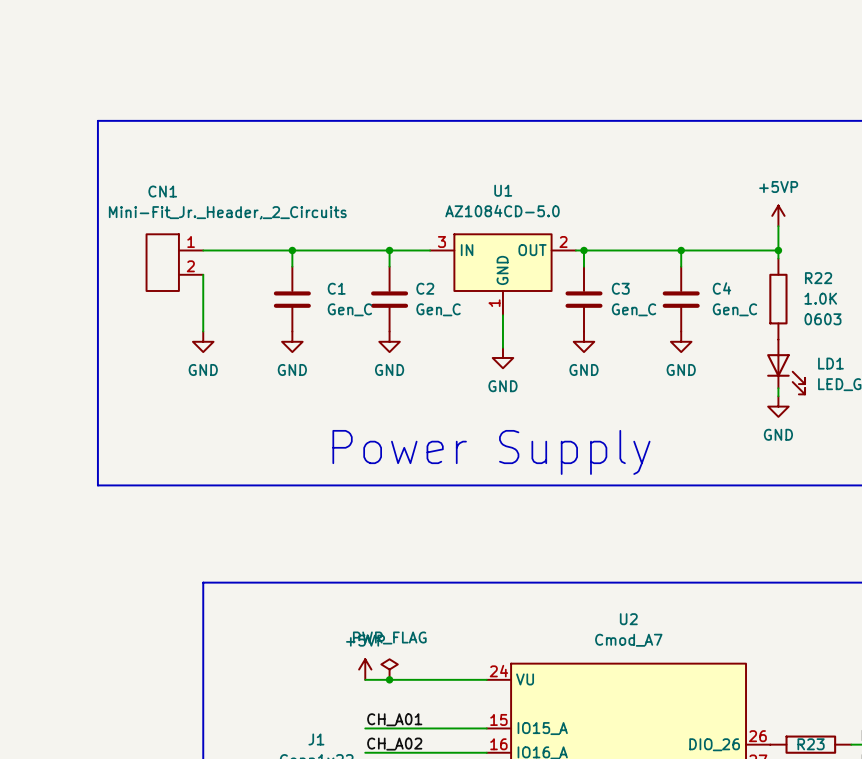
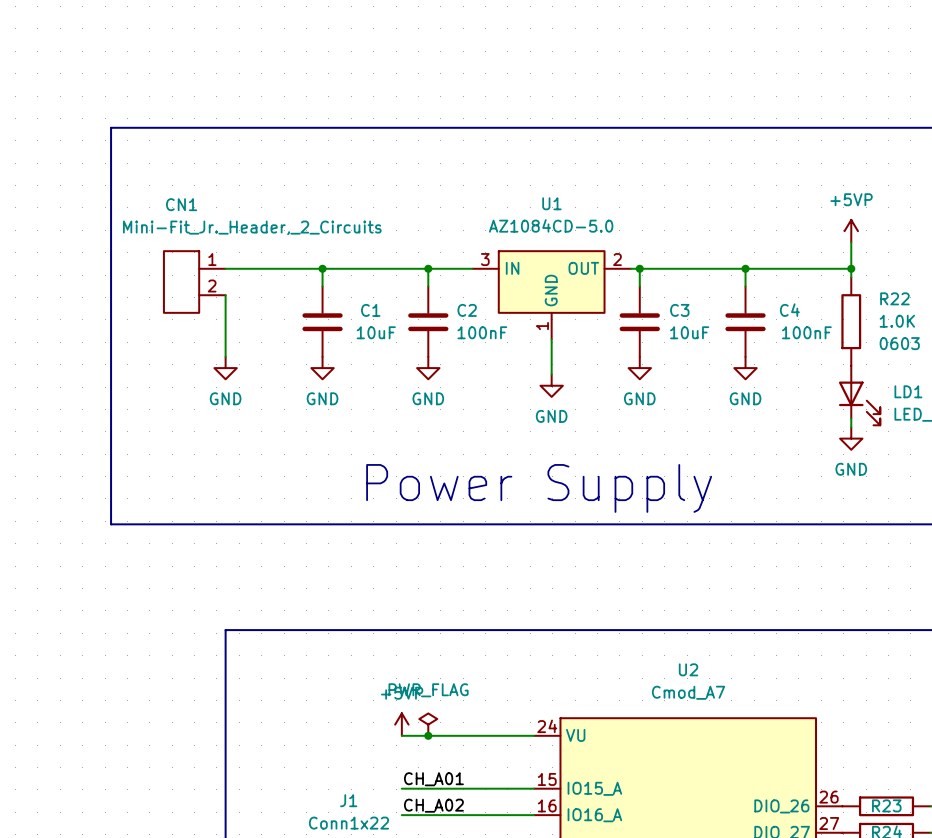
C1 value: Gen_C (349, 309) -> 10uF (376, 332)
C2 value: Gen_C (438, 309) -> 100nF (482, 332)
C3 value: Gen_C (634, 309) -> 10uF (689, 332)
C4 value: Gen_C (734, 309) -> 100nF (806, 332)

